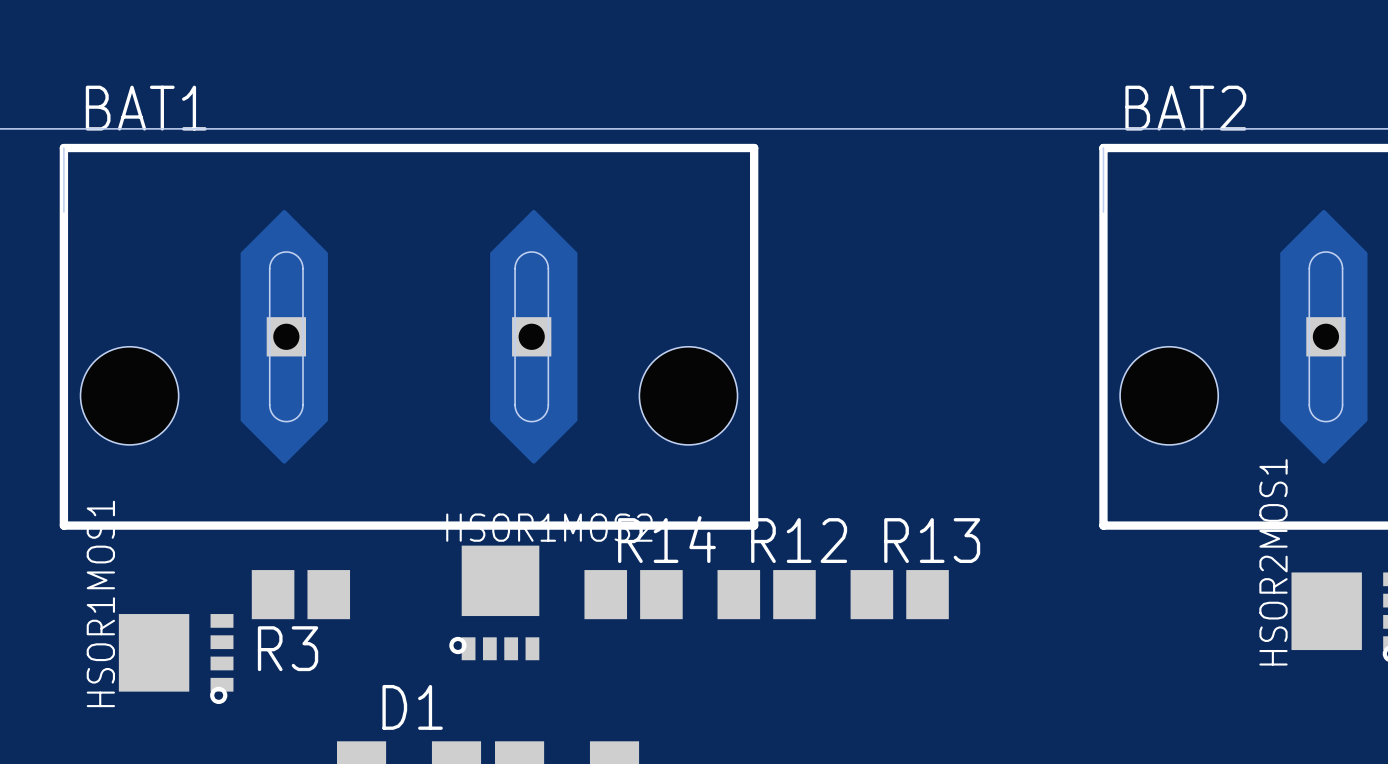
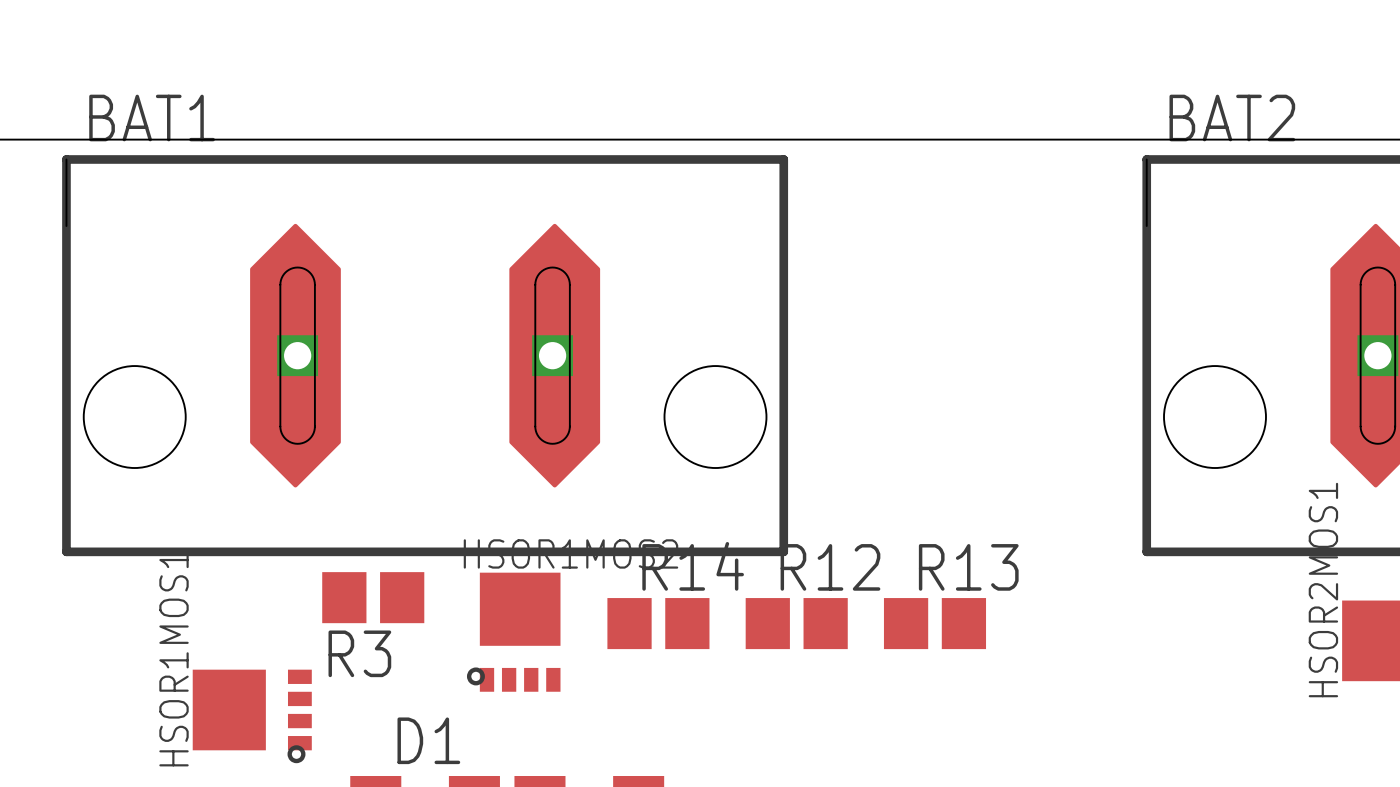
R3 position: (300, 594) -> (373, 597)
HSOR1MOS1 position: (176, 659) -> (252, 716)

